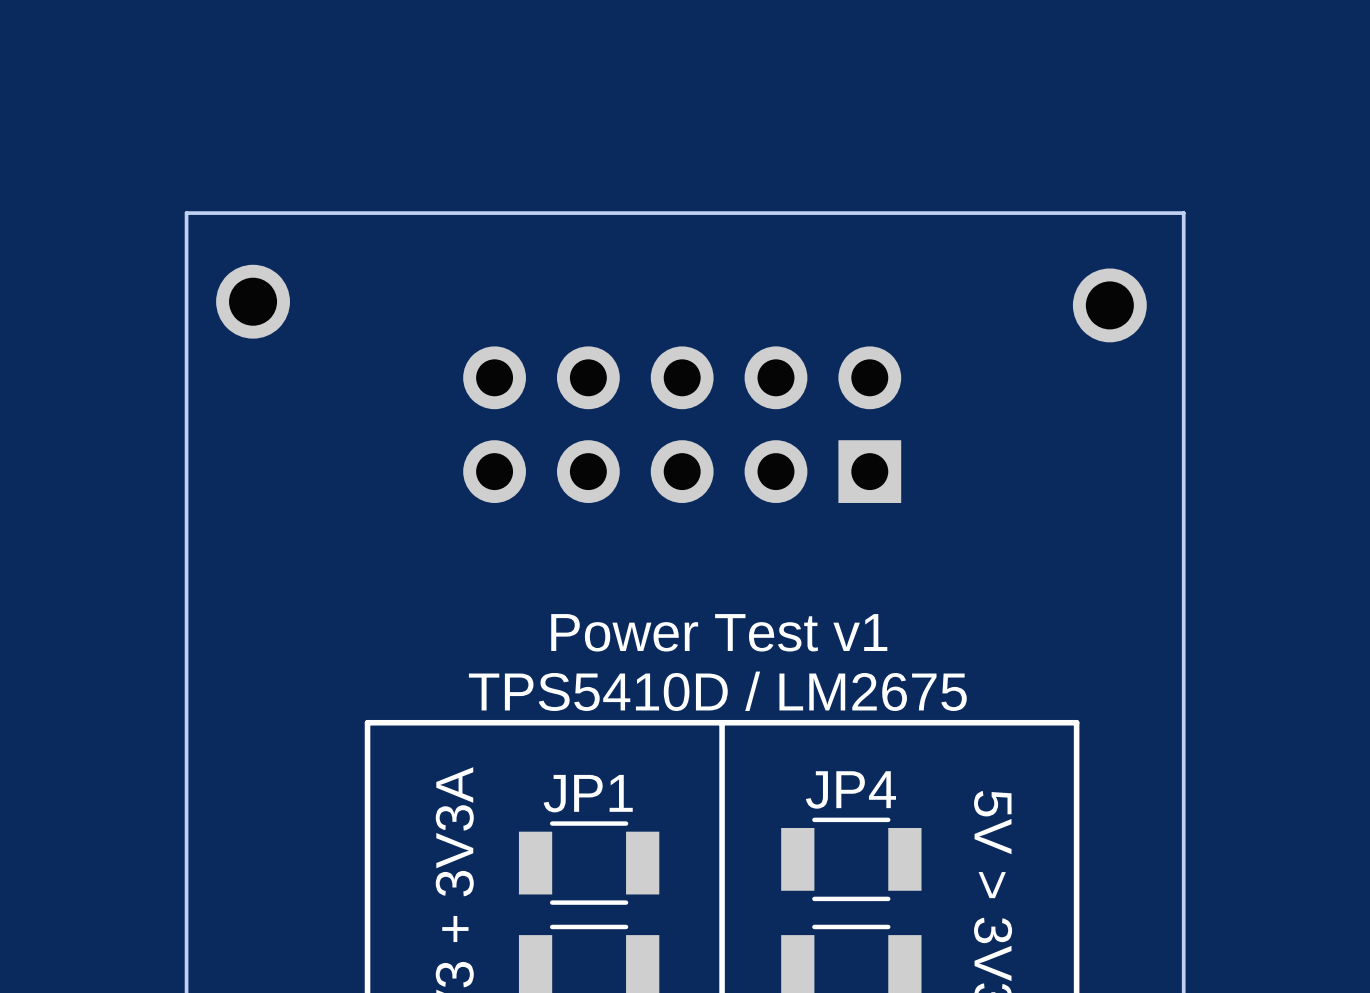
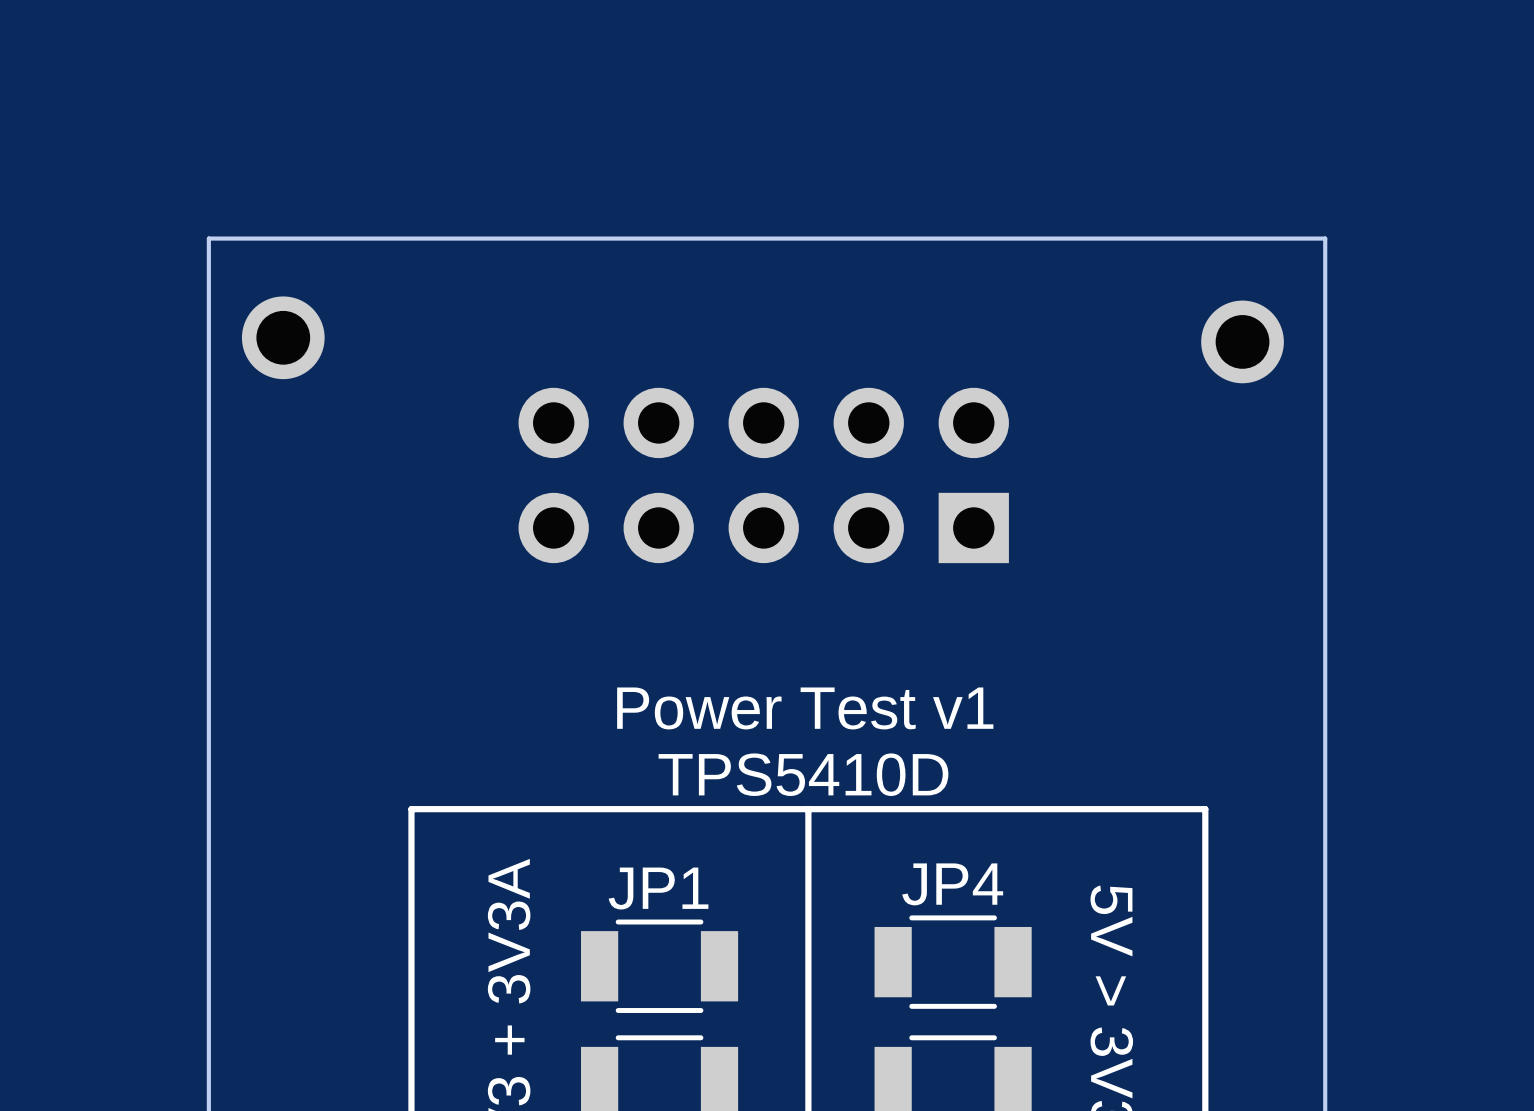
text: TPS5410D / LM2675 (717, 691) -> TPS5410D (803, 774)

